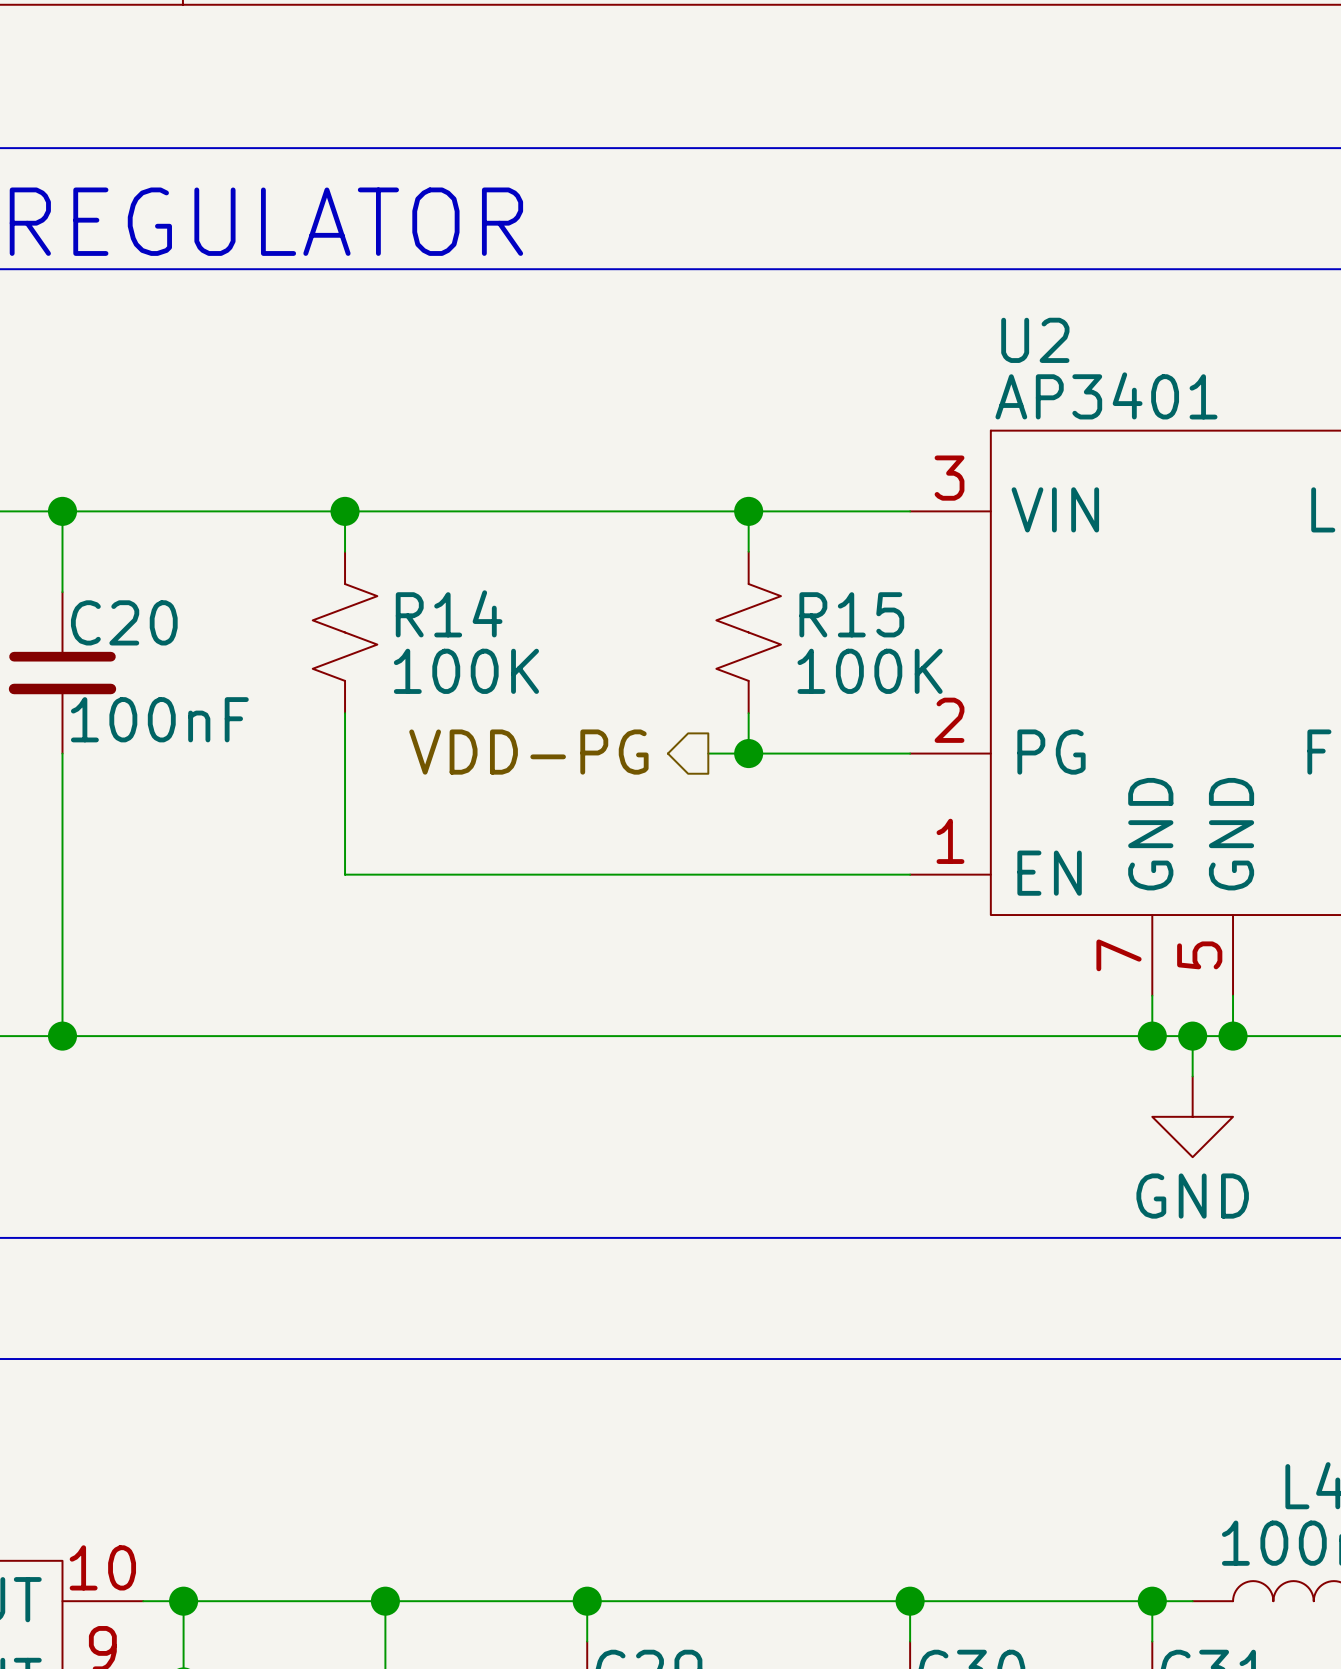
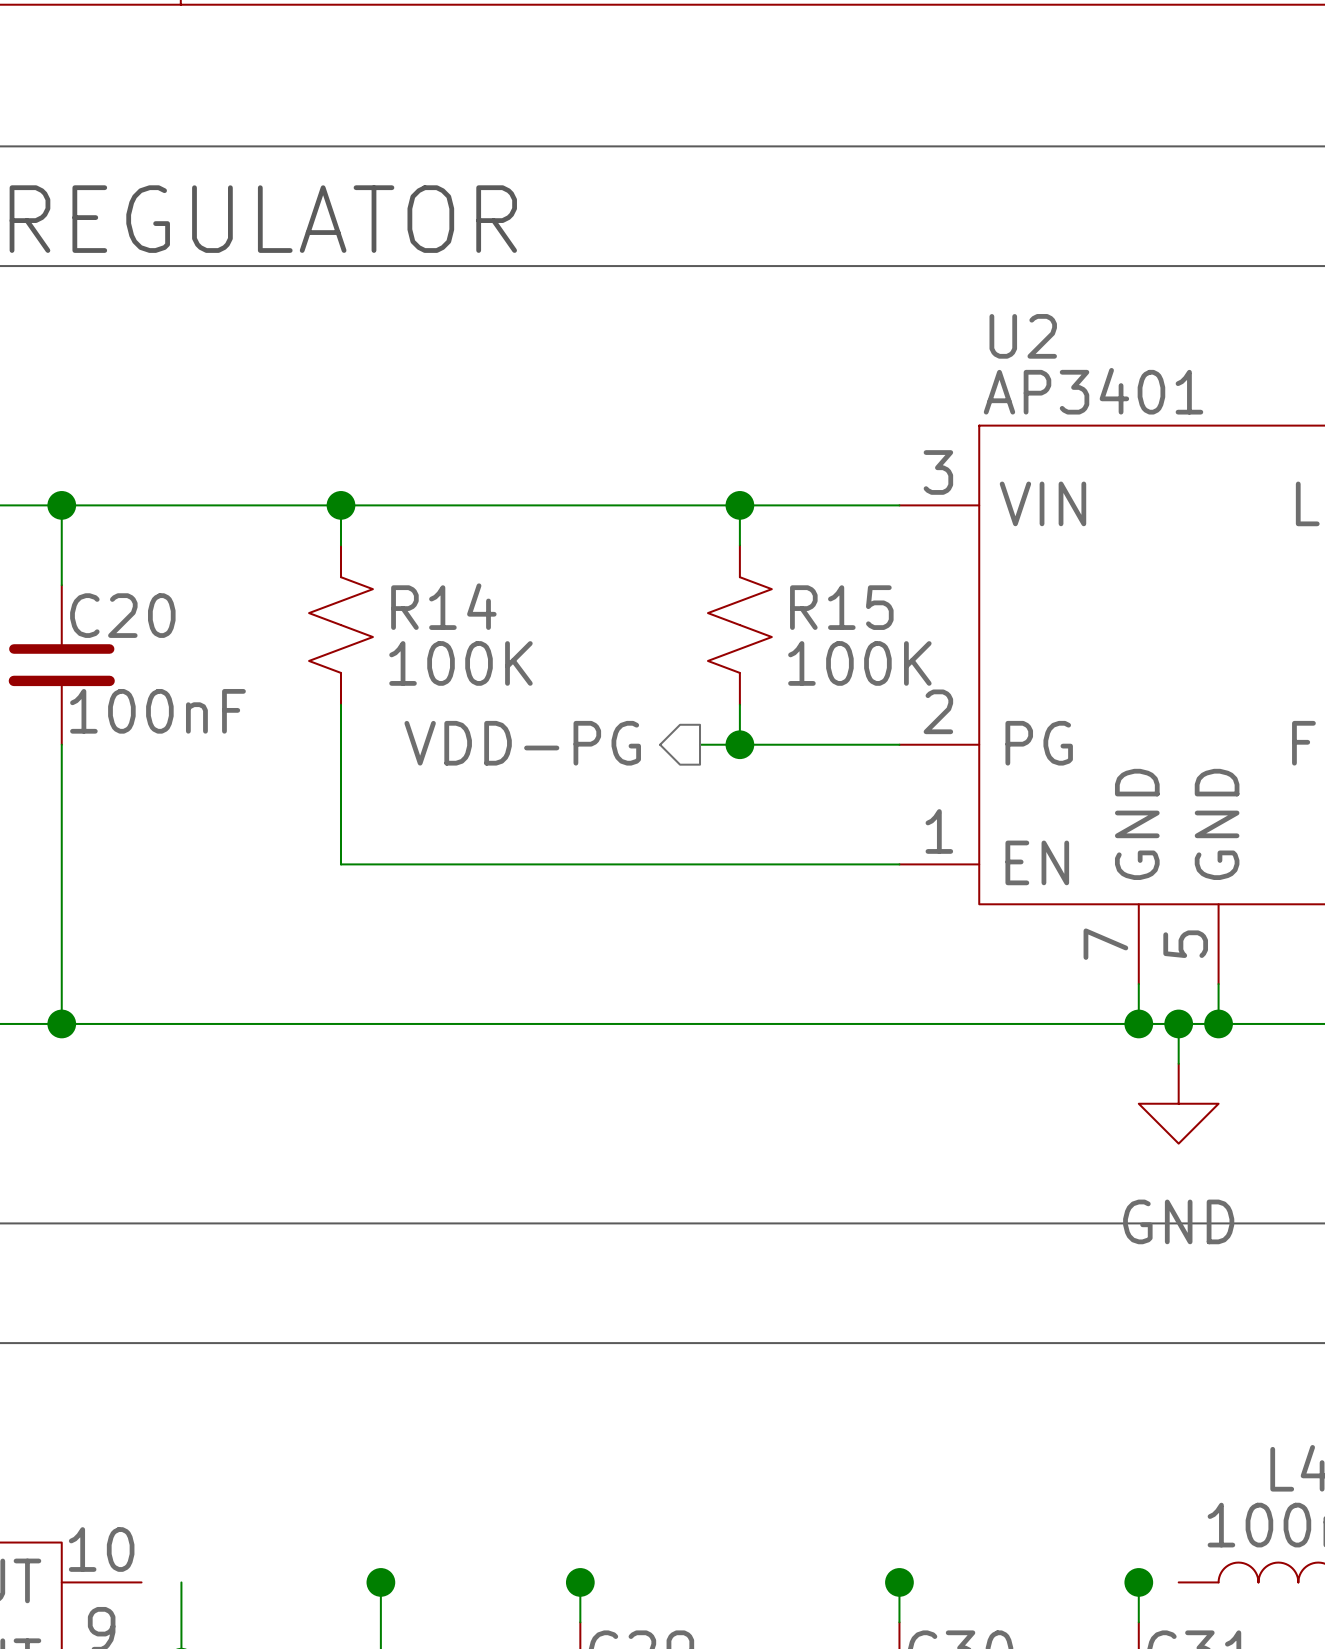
power symbol text position: GND (1192, 1196) -> GND (1178, 1221)
wire: (143, 1601) (1192, 1601) -> none
junction: (183, 1601) -> none

